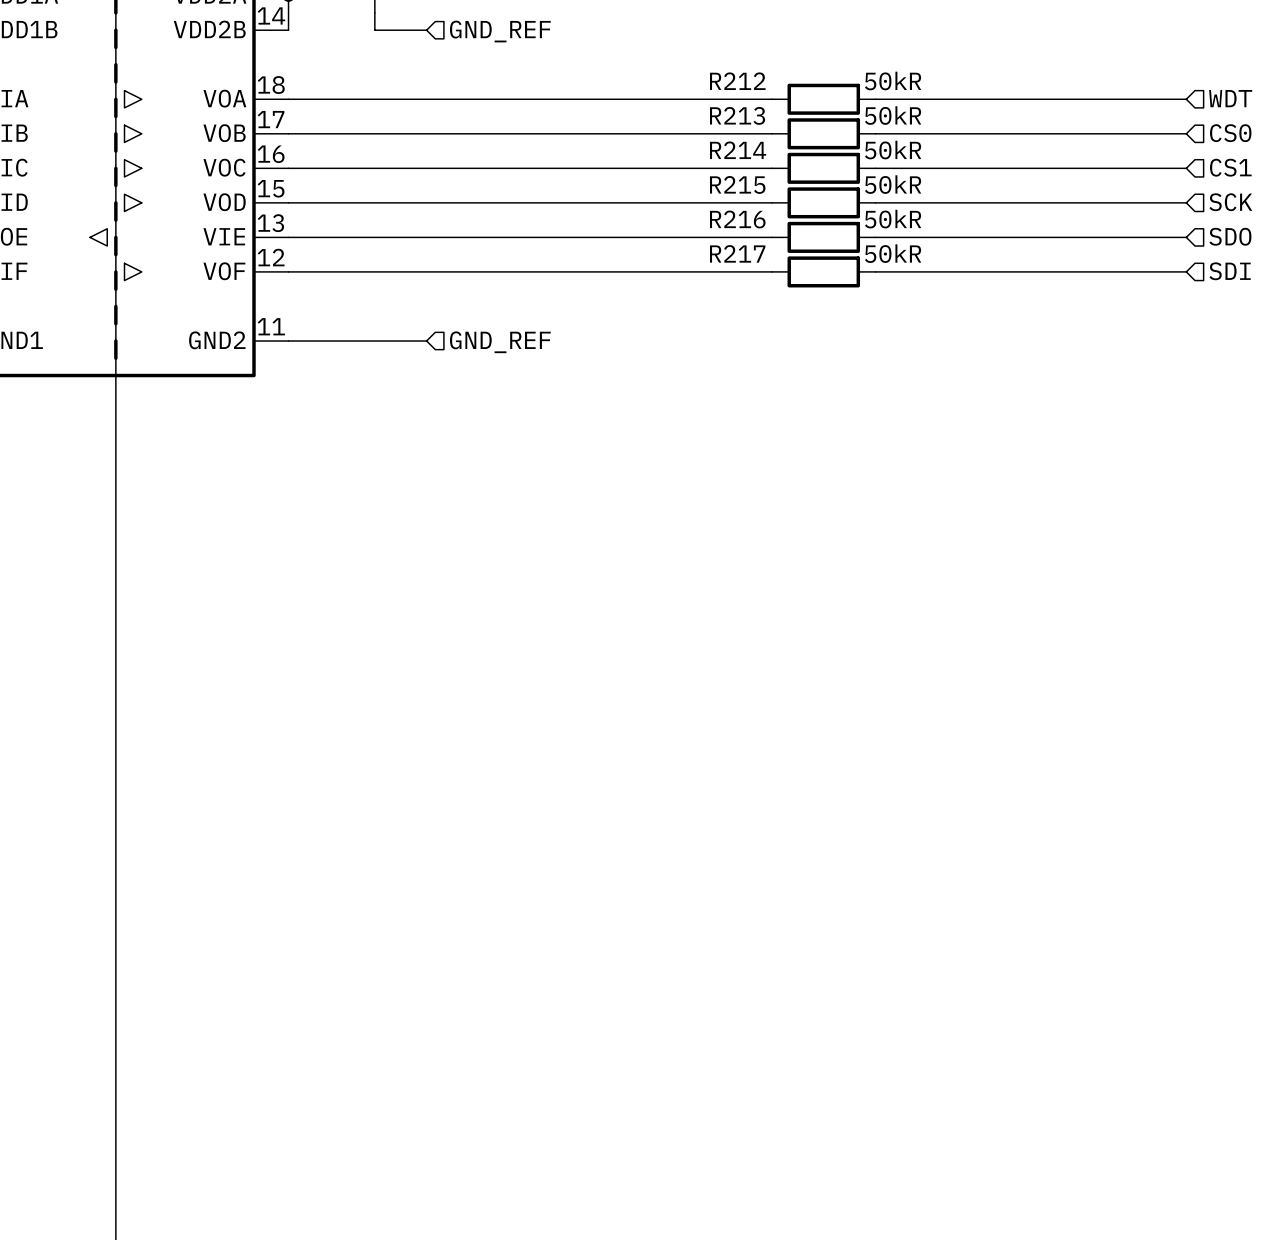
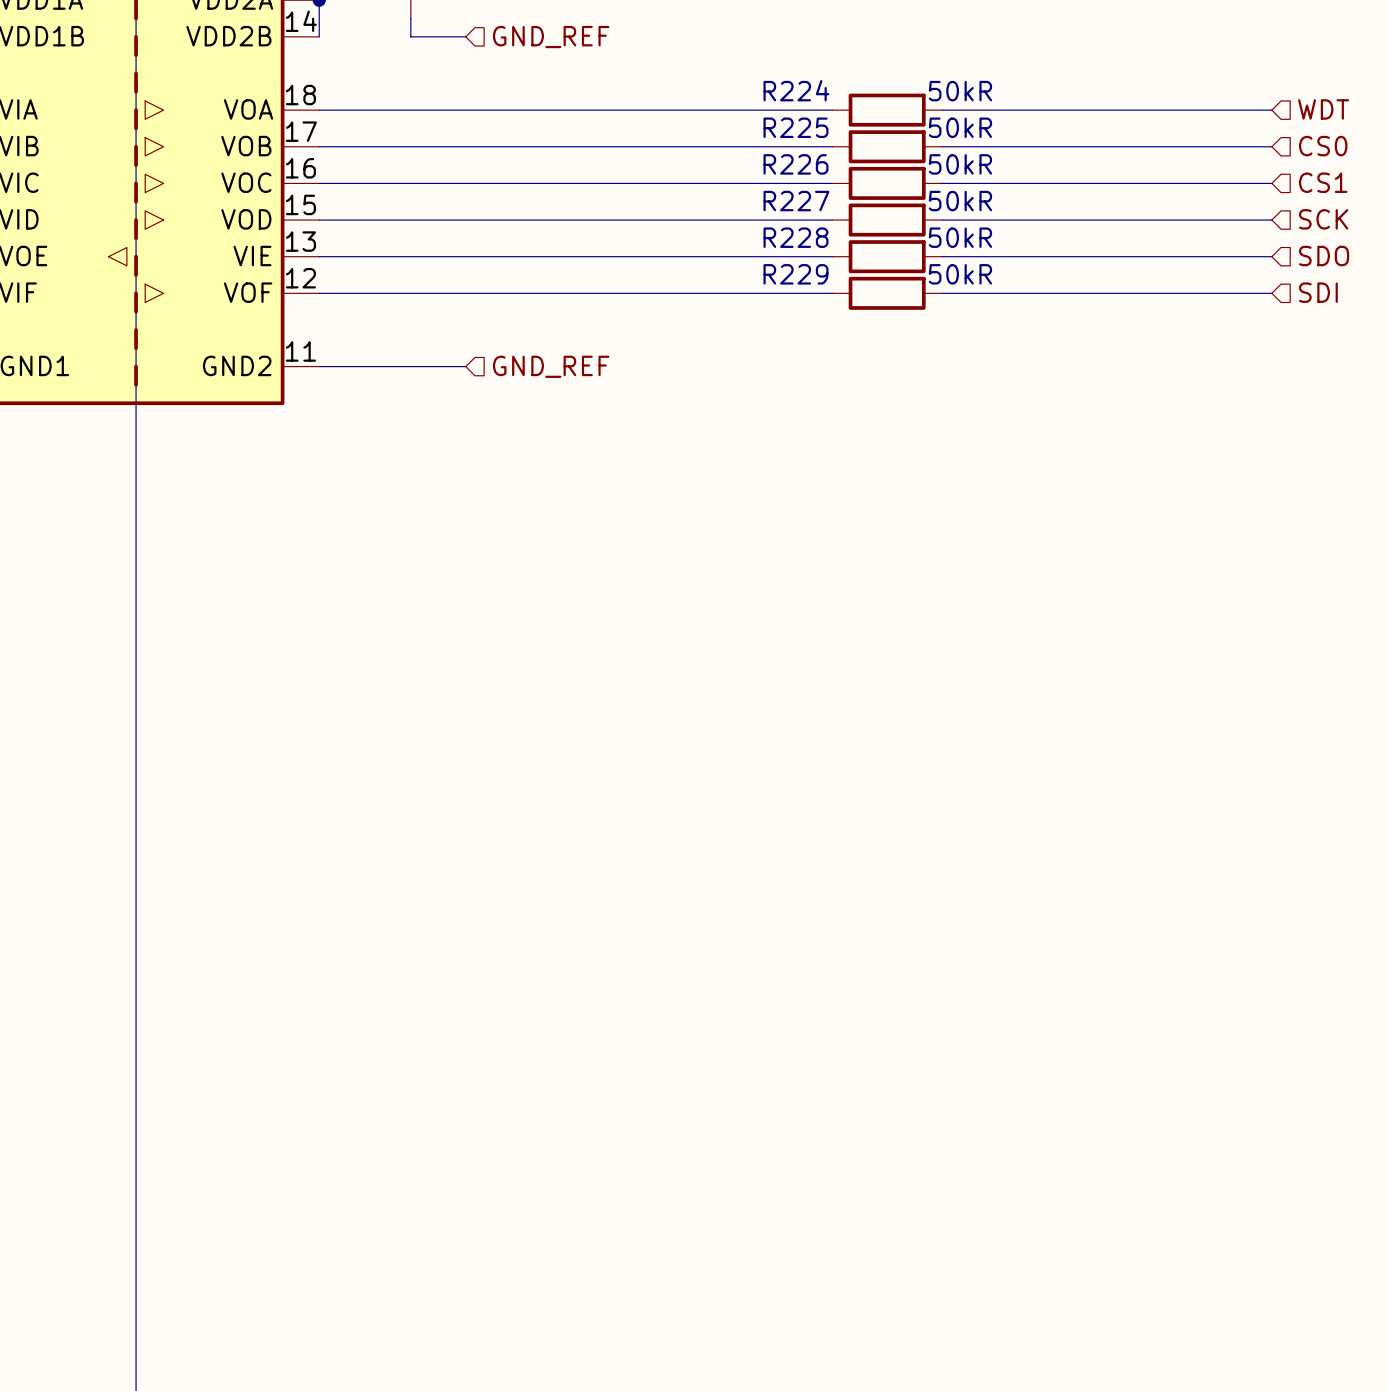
R212 name: R212 (737, 81) -> R224 (796, 90)
R213 name: R213 (737, 115) -> R225 (795, 127)
R214 name: R214 (738, 150) -> R226 (795, 164)
R215 name: R215 (737, 184) -> R227 (796, 201)
R216 name: R216 (737, 219) -> R228 (795, 237)
R217 name: R217 (737, 253) -> R229 (795, 274)

